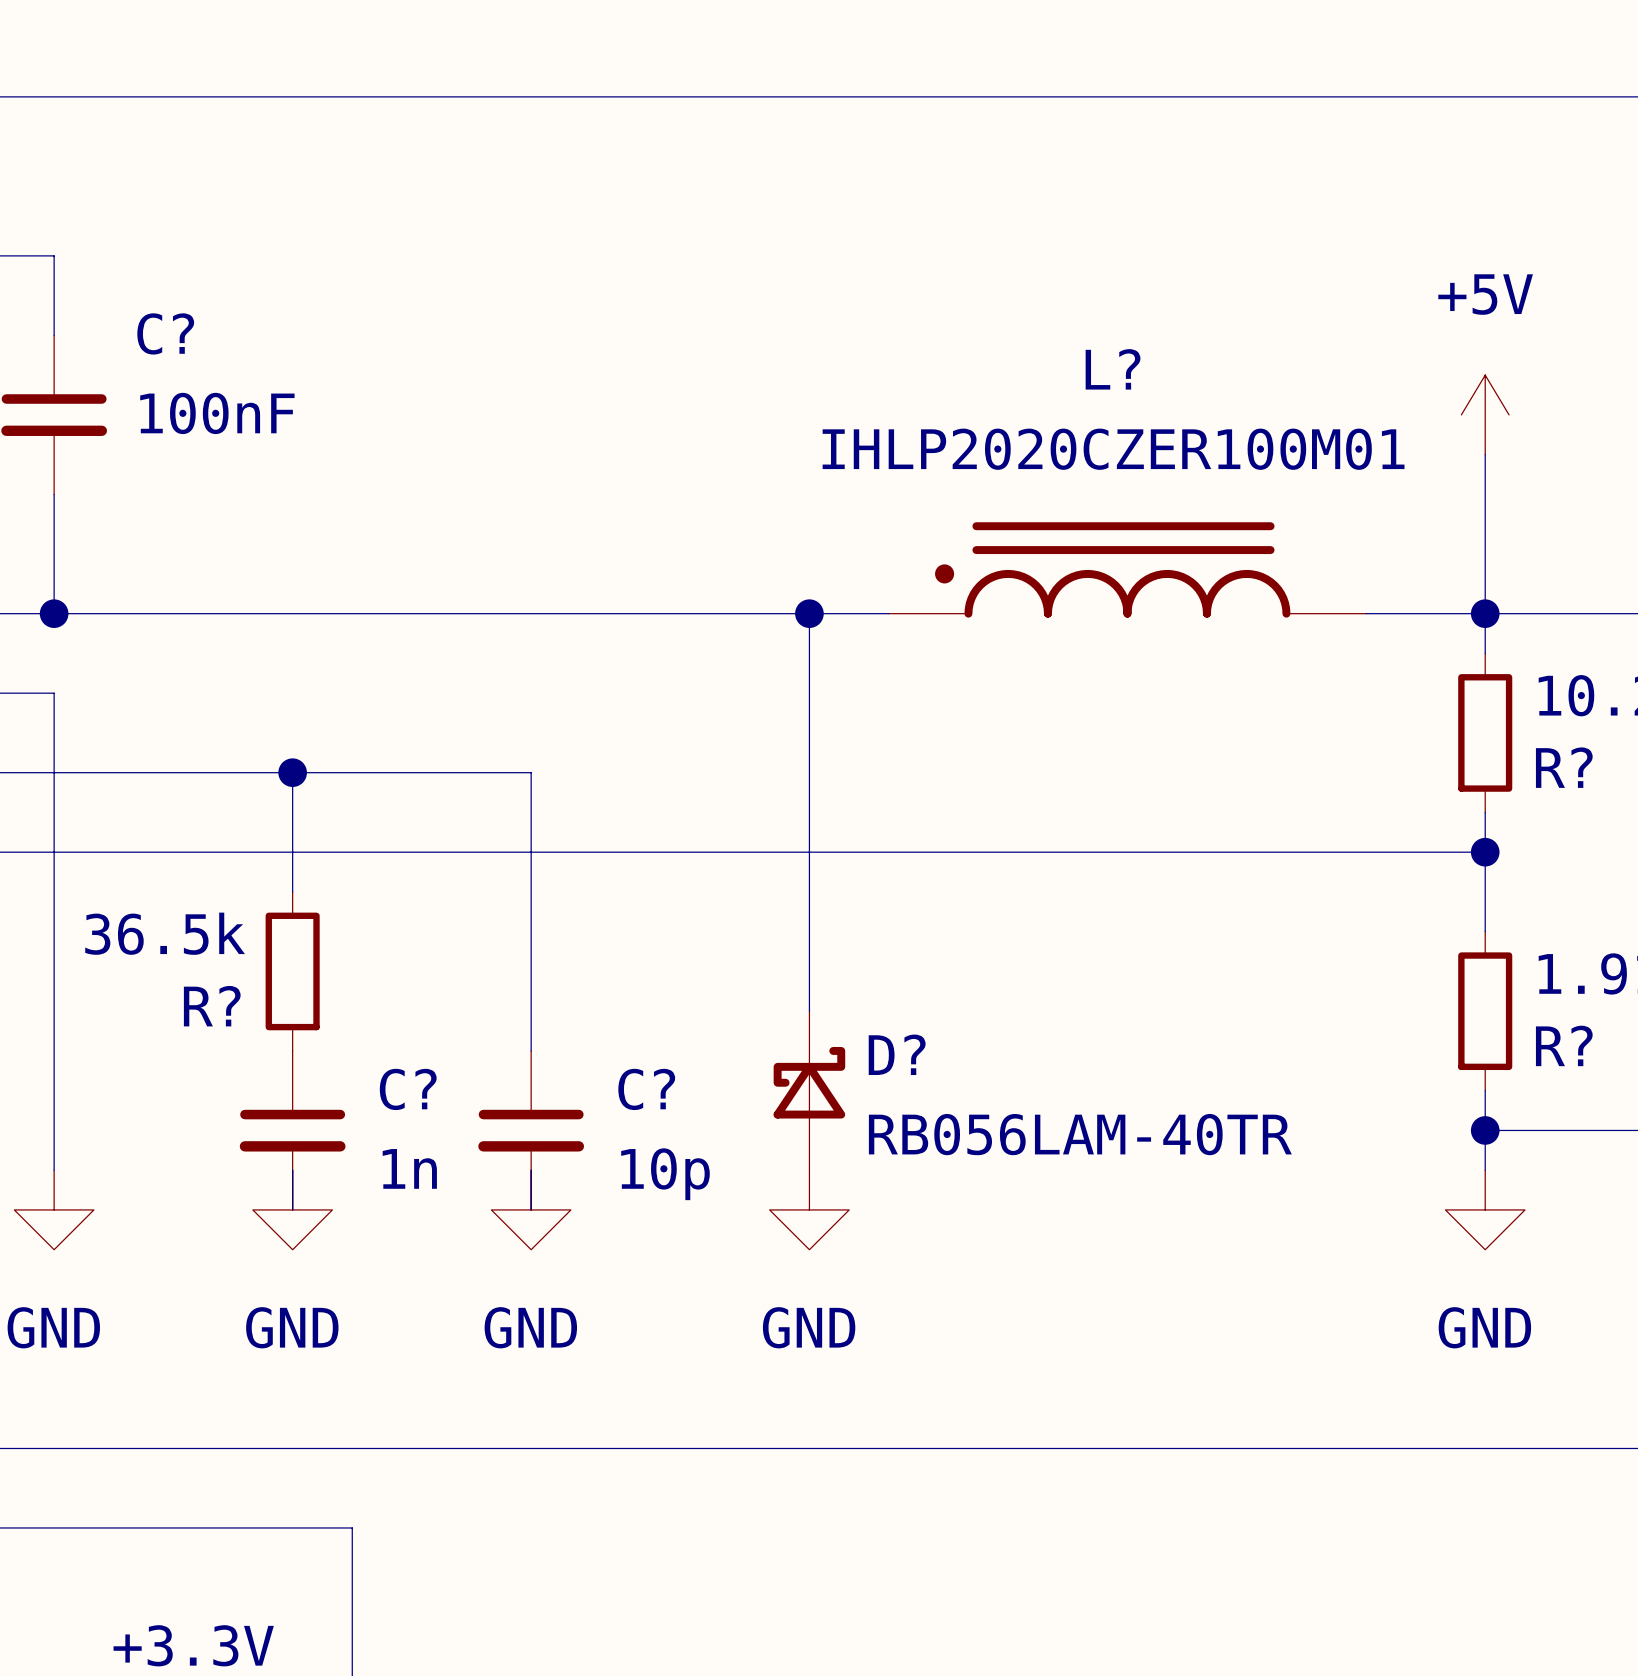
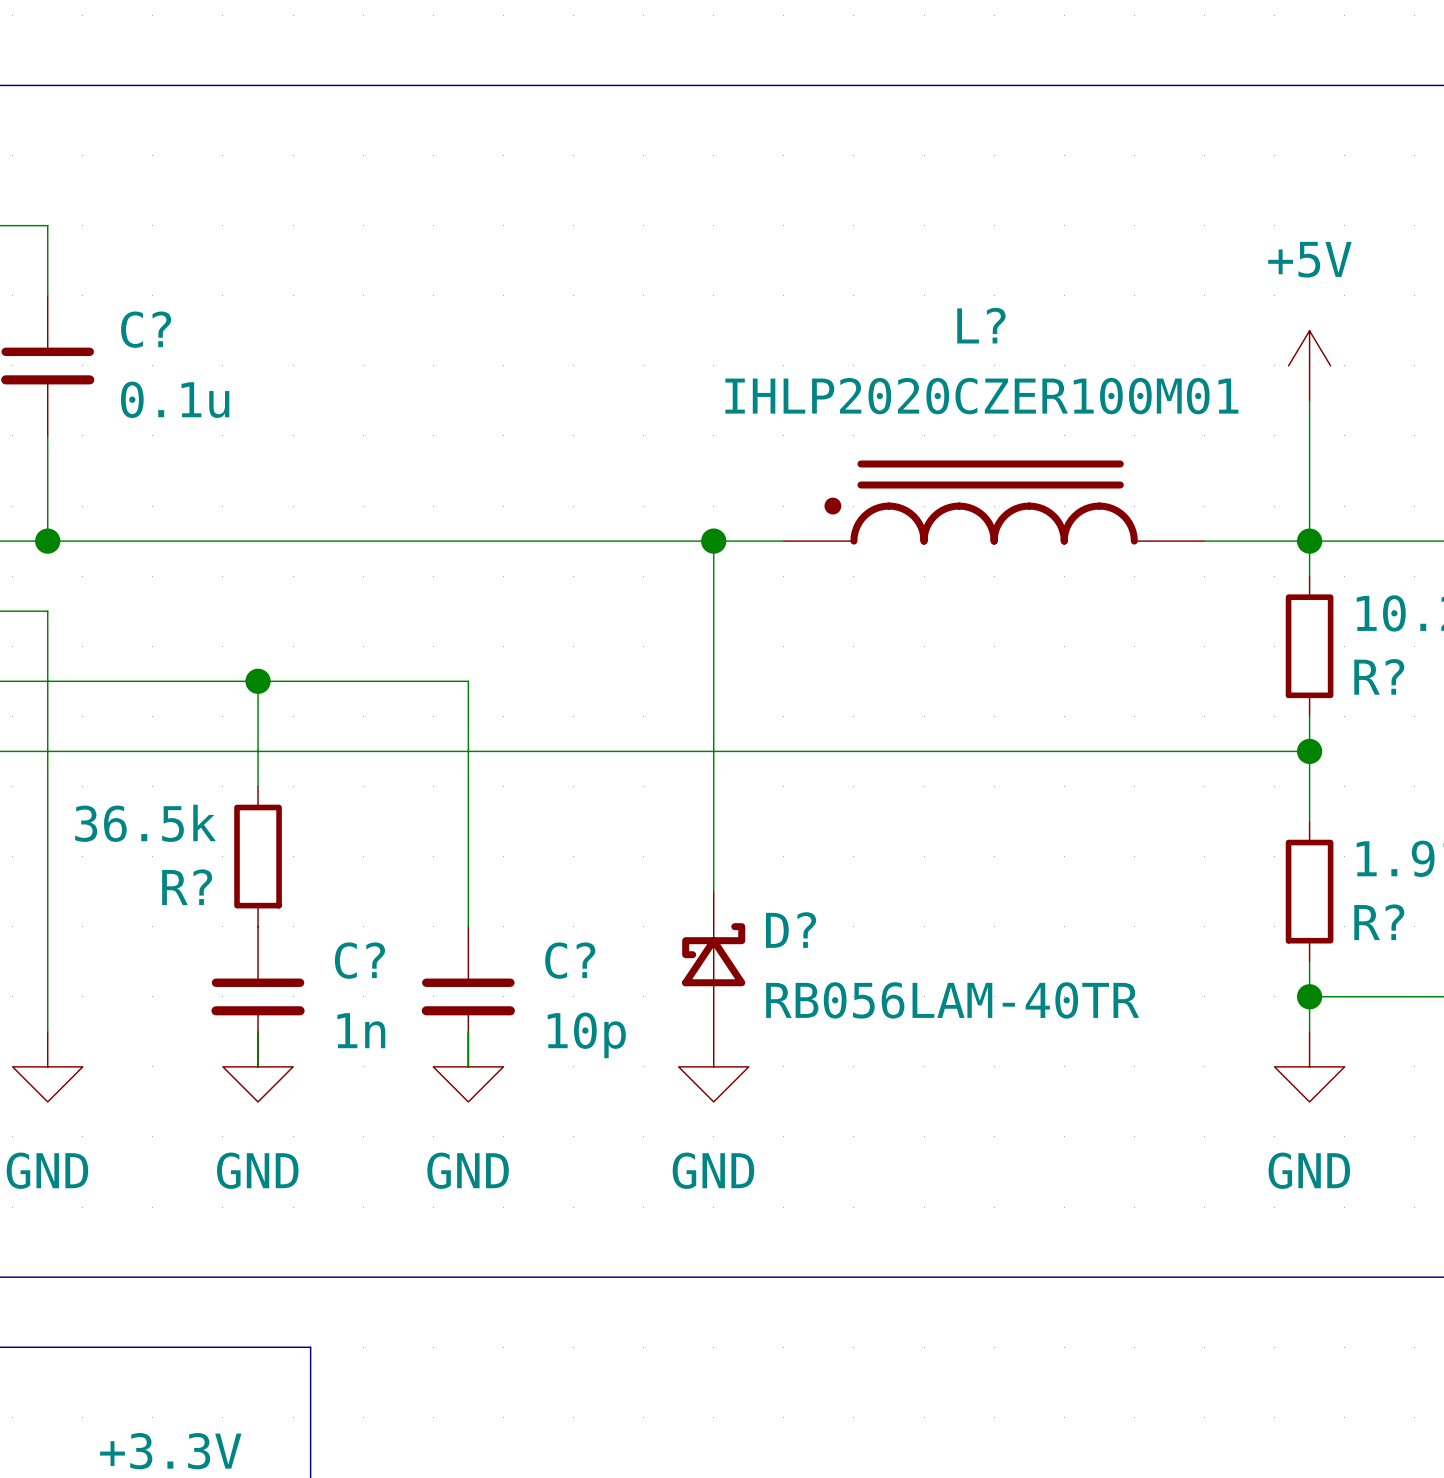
C? name position: C? (165, 333) -> C? (146, 329)
C? value: 100nF (217, 413) -> 0.1u (175, 399)

